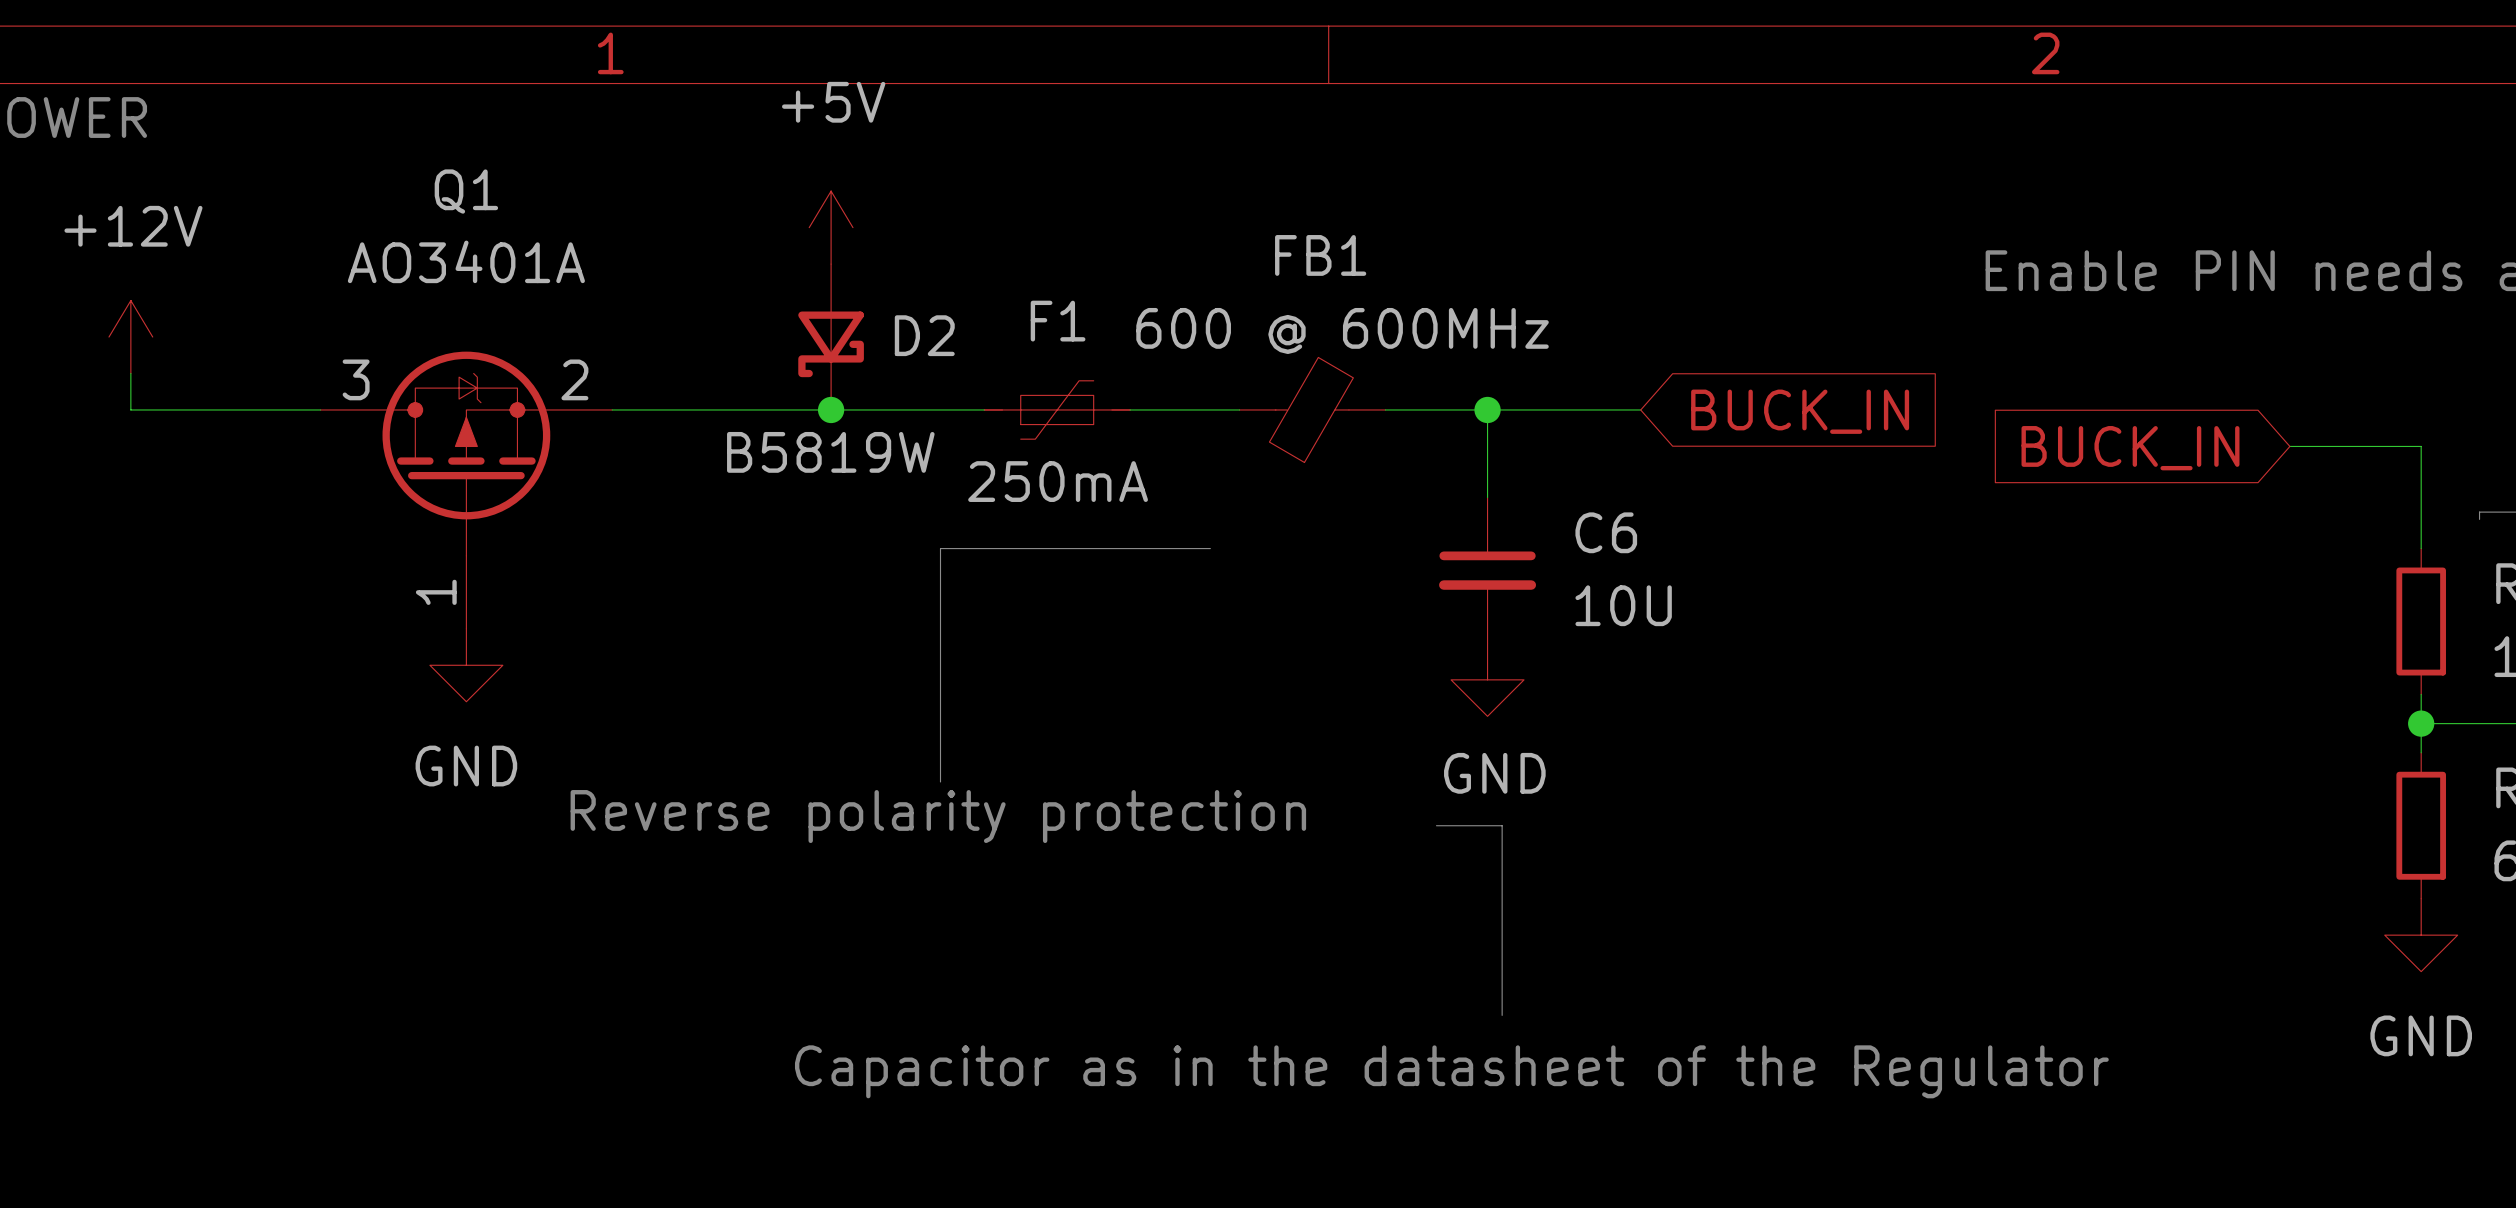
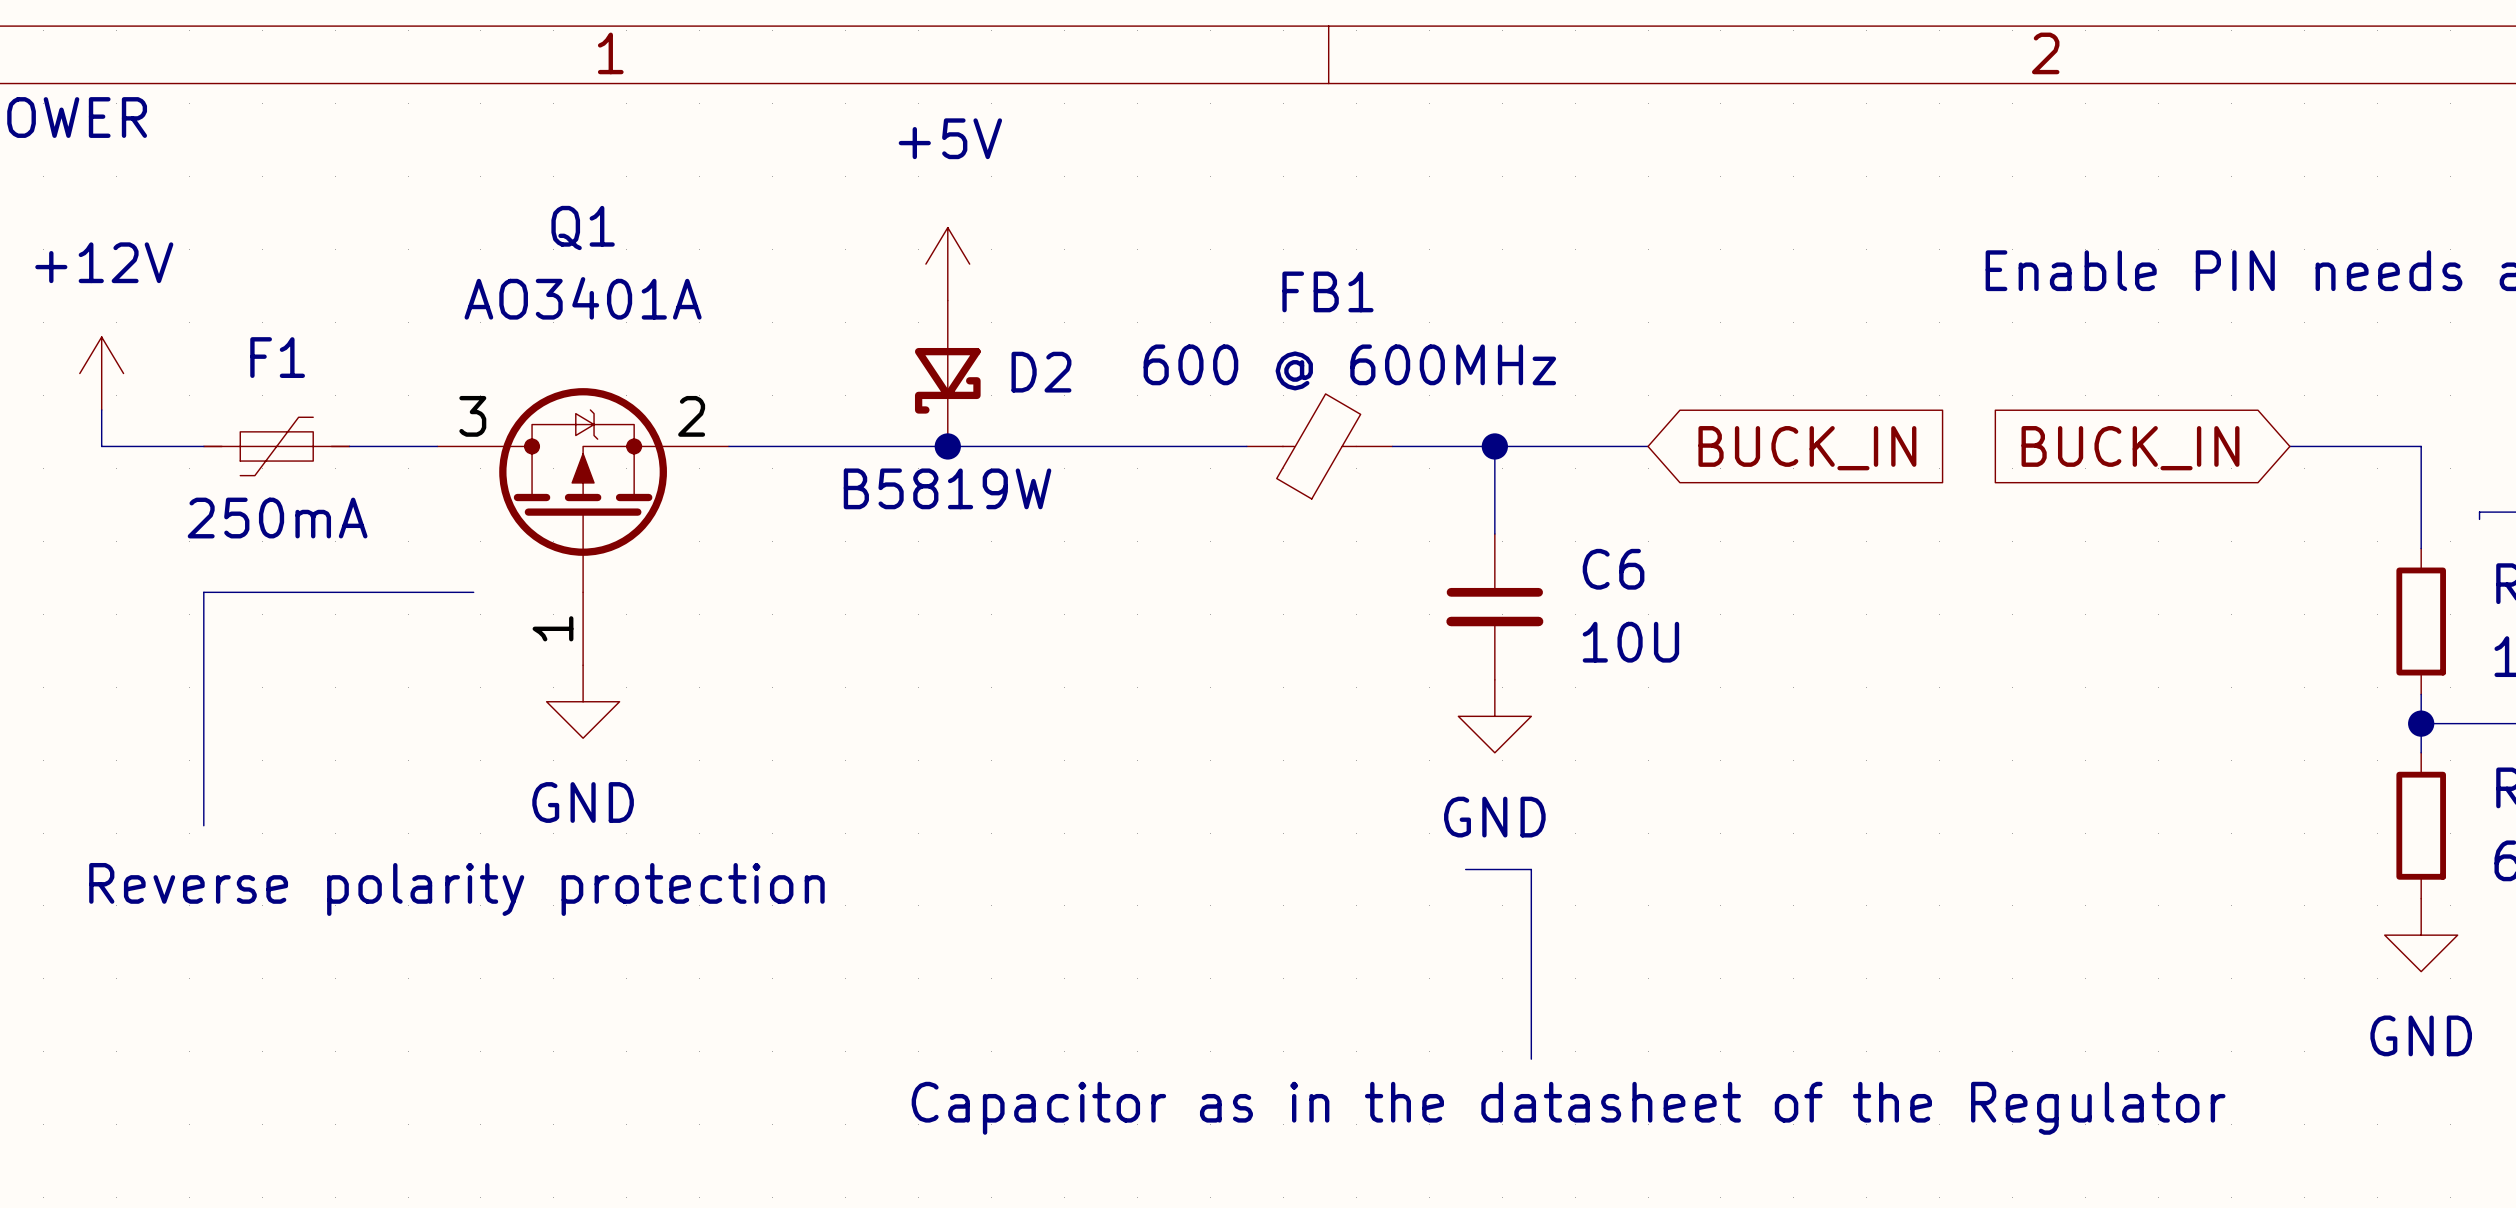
power symbol position: +5V (831, 227) -> +5V (947, 264)
power symbol position: +12V (130, 337) -> +12V (101, 373)
D2 position: (831, 337) -> (947, 373)
wire: (130, 373) (130, 409) (320, 409) -> none
wire: none -> (101, 409) (101, 446) (203, 446)
wire: (612, 409) (984, 409) -> none
junction position: (831, 409) -> (947, 446)
F1 position: (1057, 409) -> (276, 446)
wire: (1130, 409) (1239, 409) -> none
FB1 position: (1312, 409) -> (1319, 446)
wire: (1385, 409) (1640, 409) -> (1392, 446) (1648, 446)
wire: (1487, 409) (1487, 497) -> (1494, 446) (1494, 533)
junction position: (1487, 409) -> (1494, 446)
global label position: BUCK_IN (1800, 411) -> BUCK_IN (1807, 448)
wire: none -> (349, 446) (437, 446)
wire: none -> (728, 446) (1246, 446)
Q1 position: (466, 490) -> (583, 526)
line: (1210, 548) (940, 548) (940, 781) -> none
C6 position: (1487, 570) -> (1494, 606)
line: none -> (473, 592) (203, 592) (203, 825)
power symbol position: GND (466, 665) -> GND (583, 701)
power symbol position: GND (1487, 679) -> GND (1494, 716)
power symbol text position: GND (1494, 773) -> GND (1494, 817)
text position: Reverse polarity protection (938, 816) -> Reverse polarity protection (456, 889)
line: (1436, 825) (1502, 825) (1502, 1015) -> (1465, 869) (1531, 869) (1531, 1059)
text position: Capacitor as in the datasheet of the Regulator (1451, 1071) -> Capacitor as in the datasheet of the Regulator (1568, 1108)

